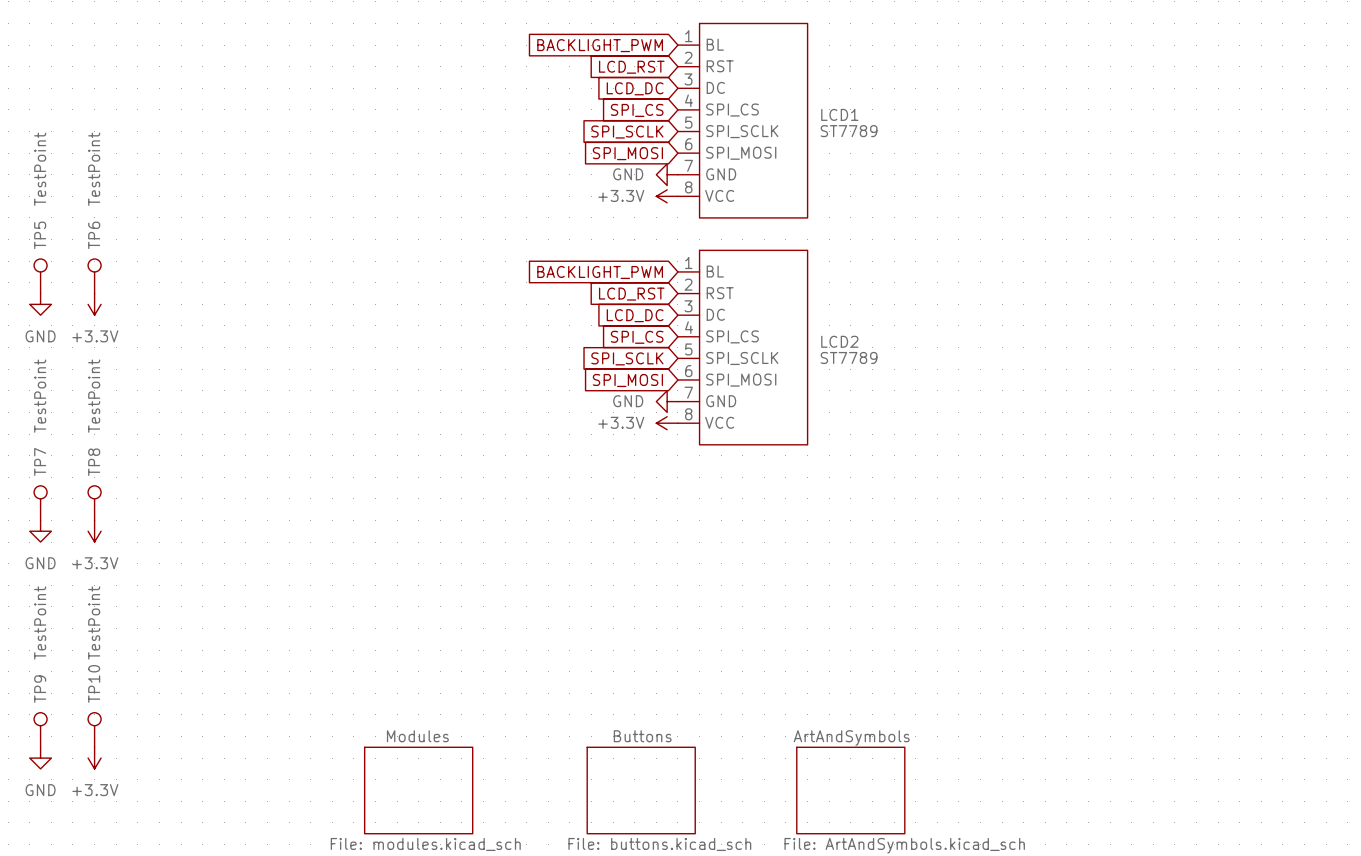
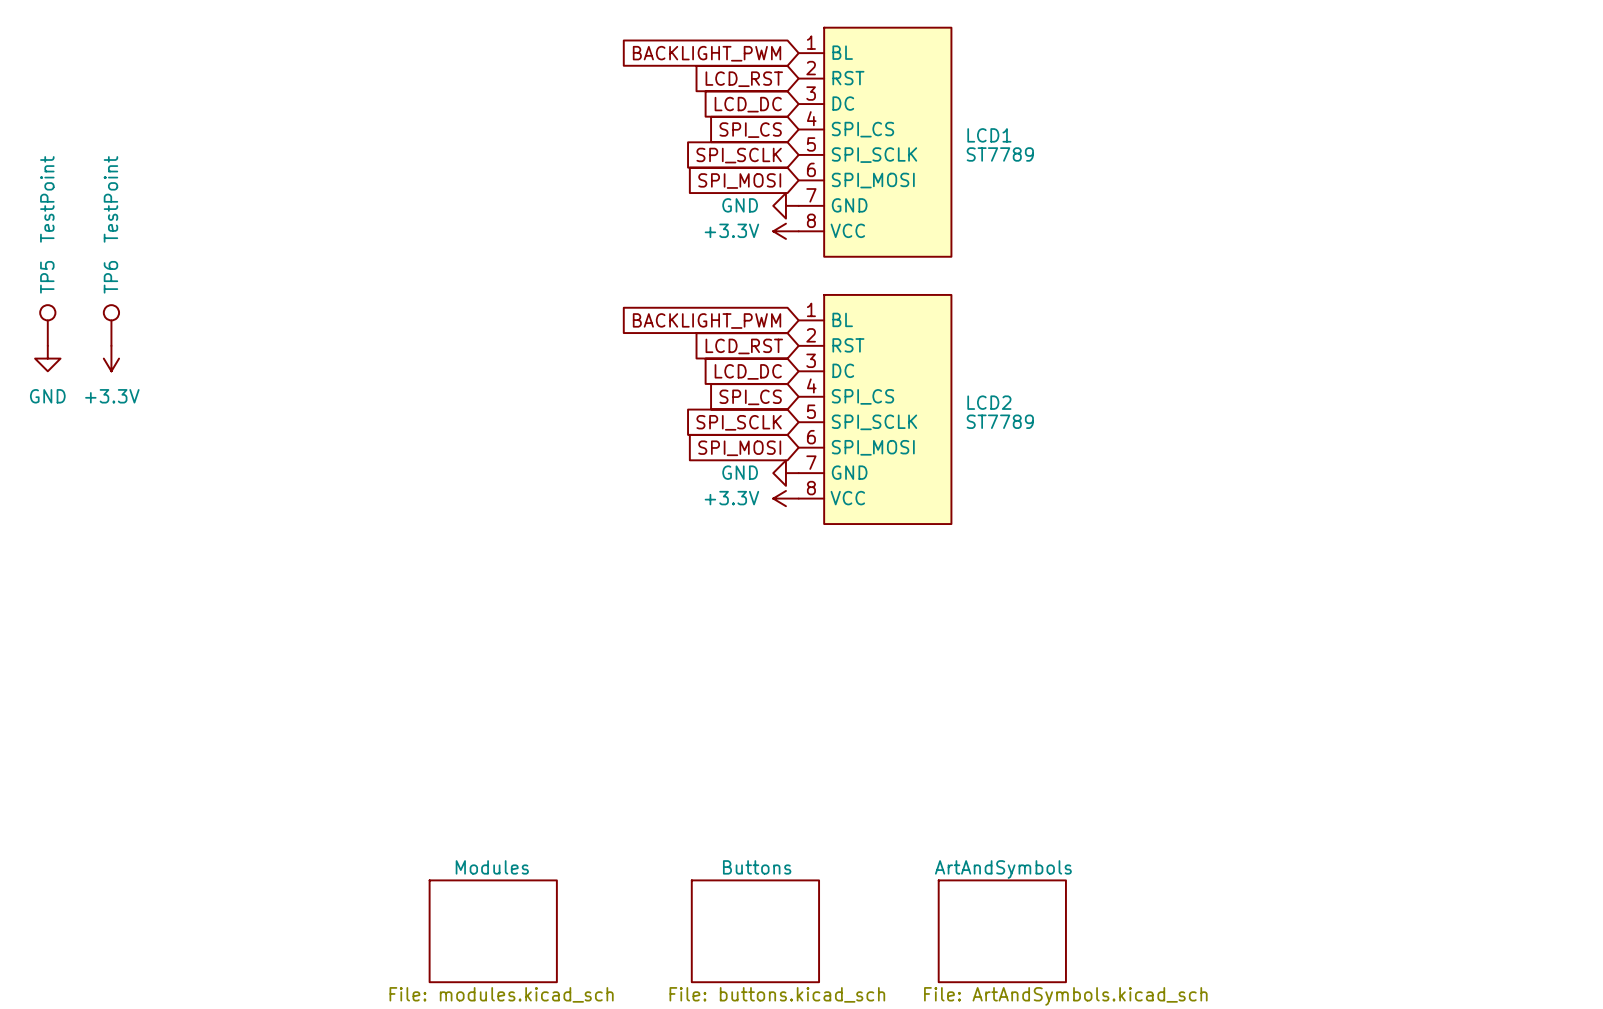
TP7: TestPoint (40, 503) -> none
TP8: TestPoint (94, 503) -> none
power symbol: GND (40, 531) -> none
power symbol: +3.3V (94, 531) -> none
TP9: TestPoint (40, 730) -> none
TP10: TestPoint (94, 730) -> none
power symbol: GND (40, 758) -> none
power symbol: +3.3V (94, 758) -> none

